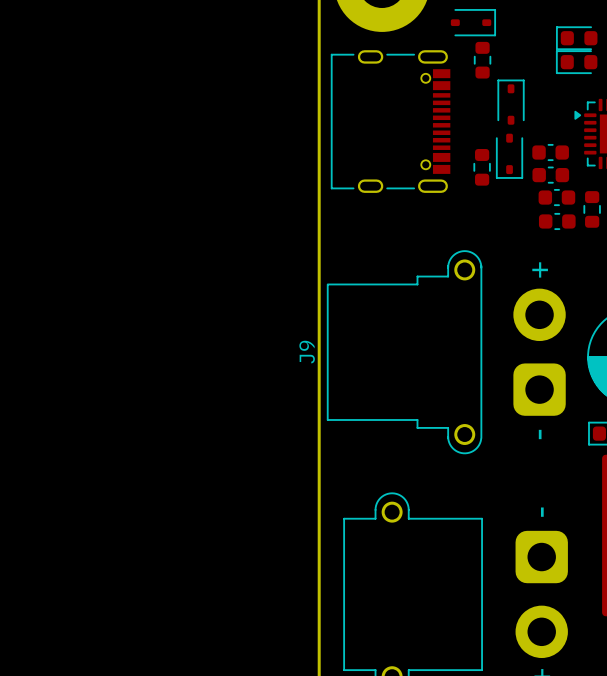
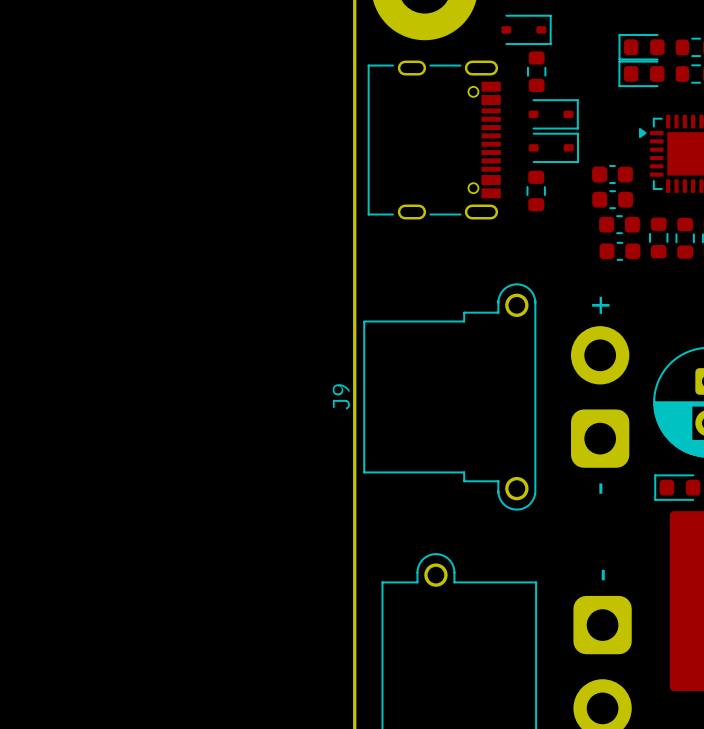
part rotation: 0° (511, 102) -> 90° clockwise (553, 114)
part rotation: 0° (509, 156) -> 90° counterclockwise (553, 147)
part position: (509, 156) -> (553, 147)

